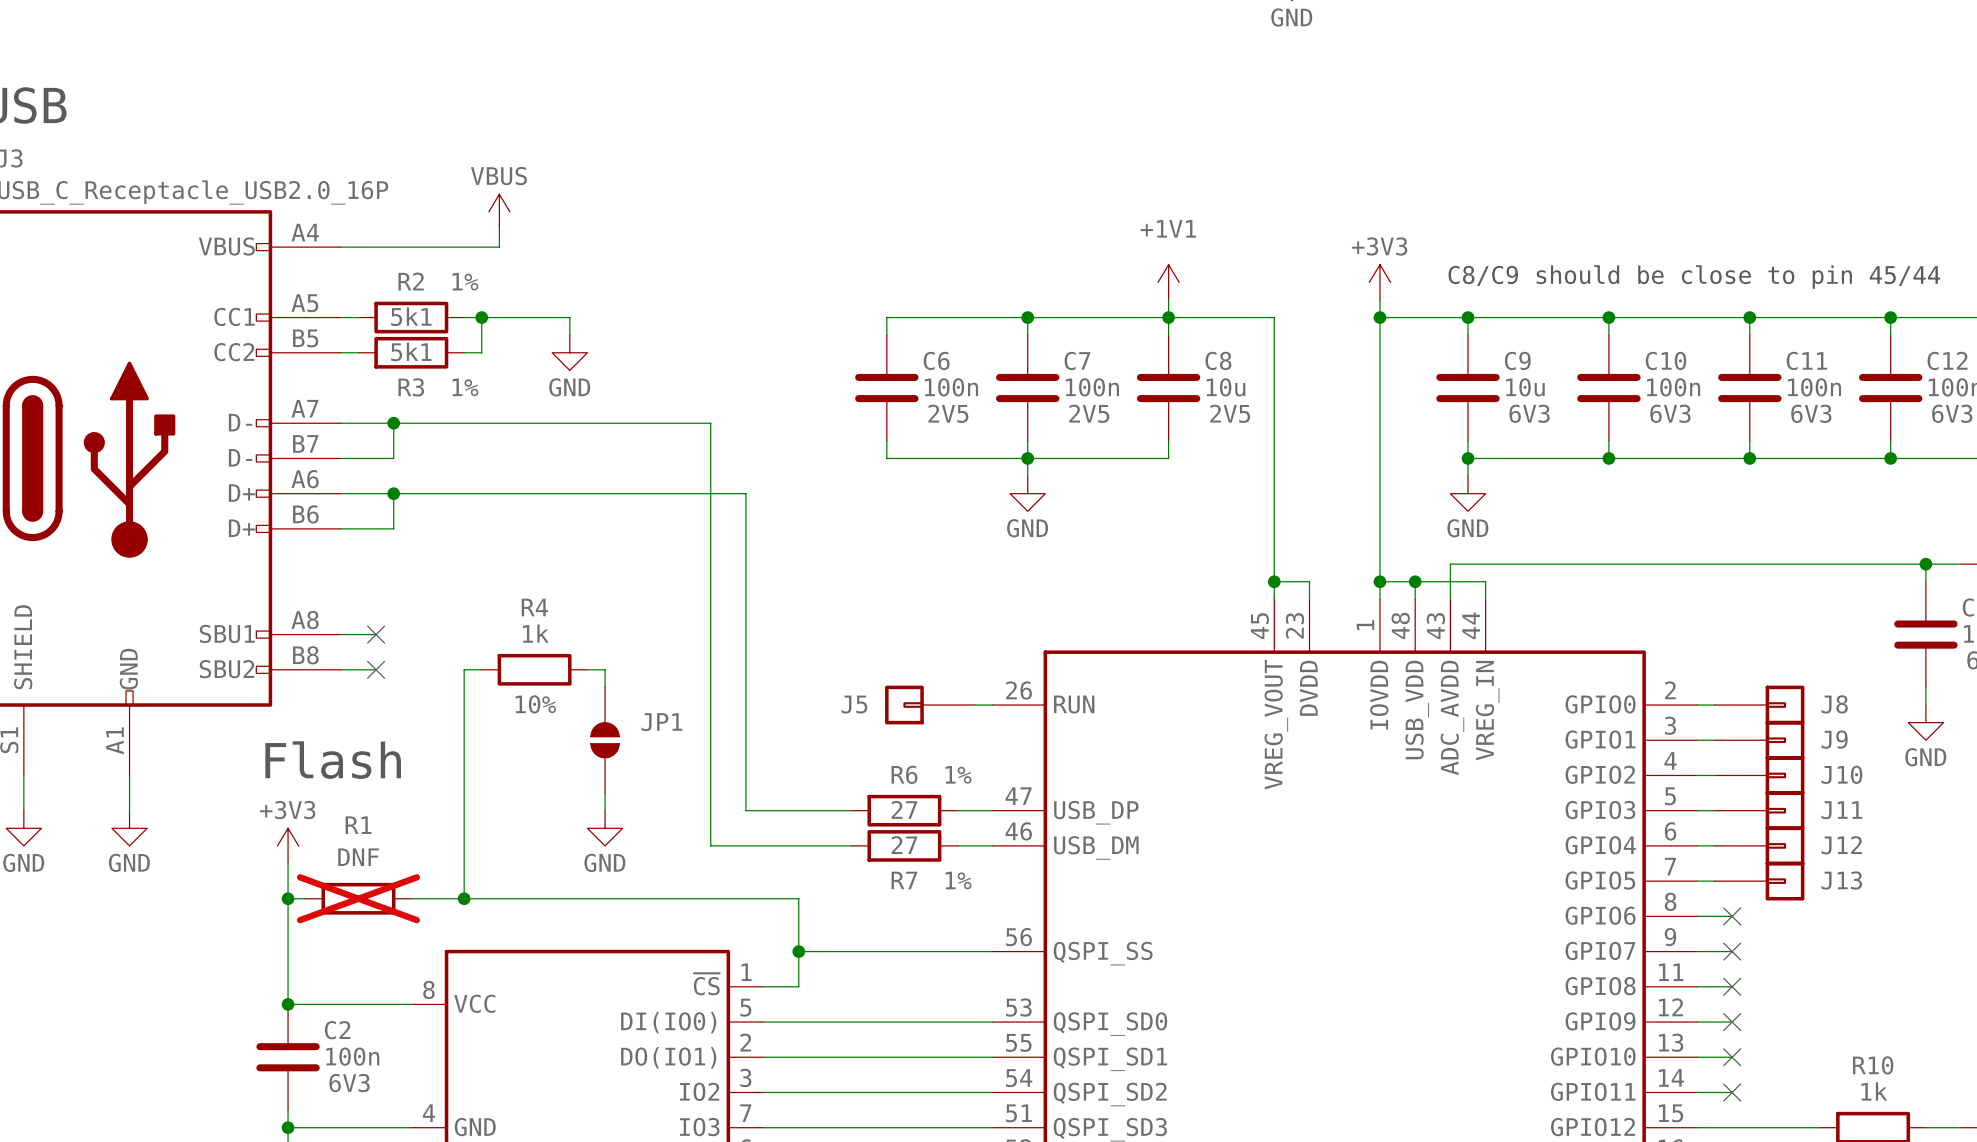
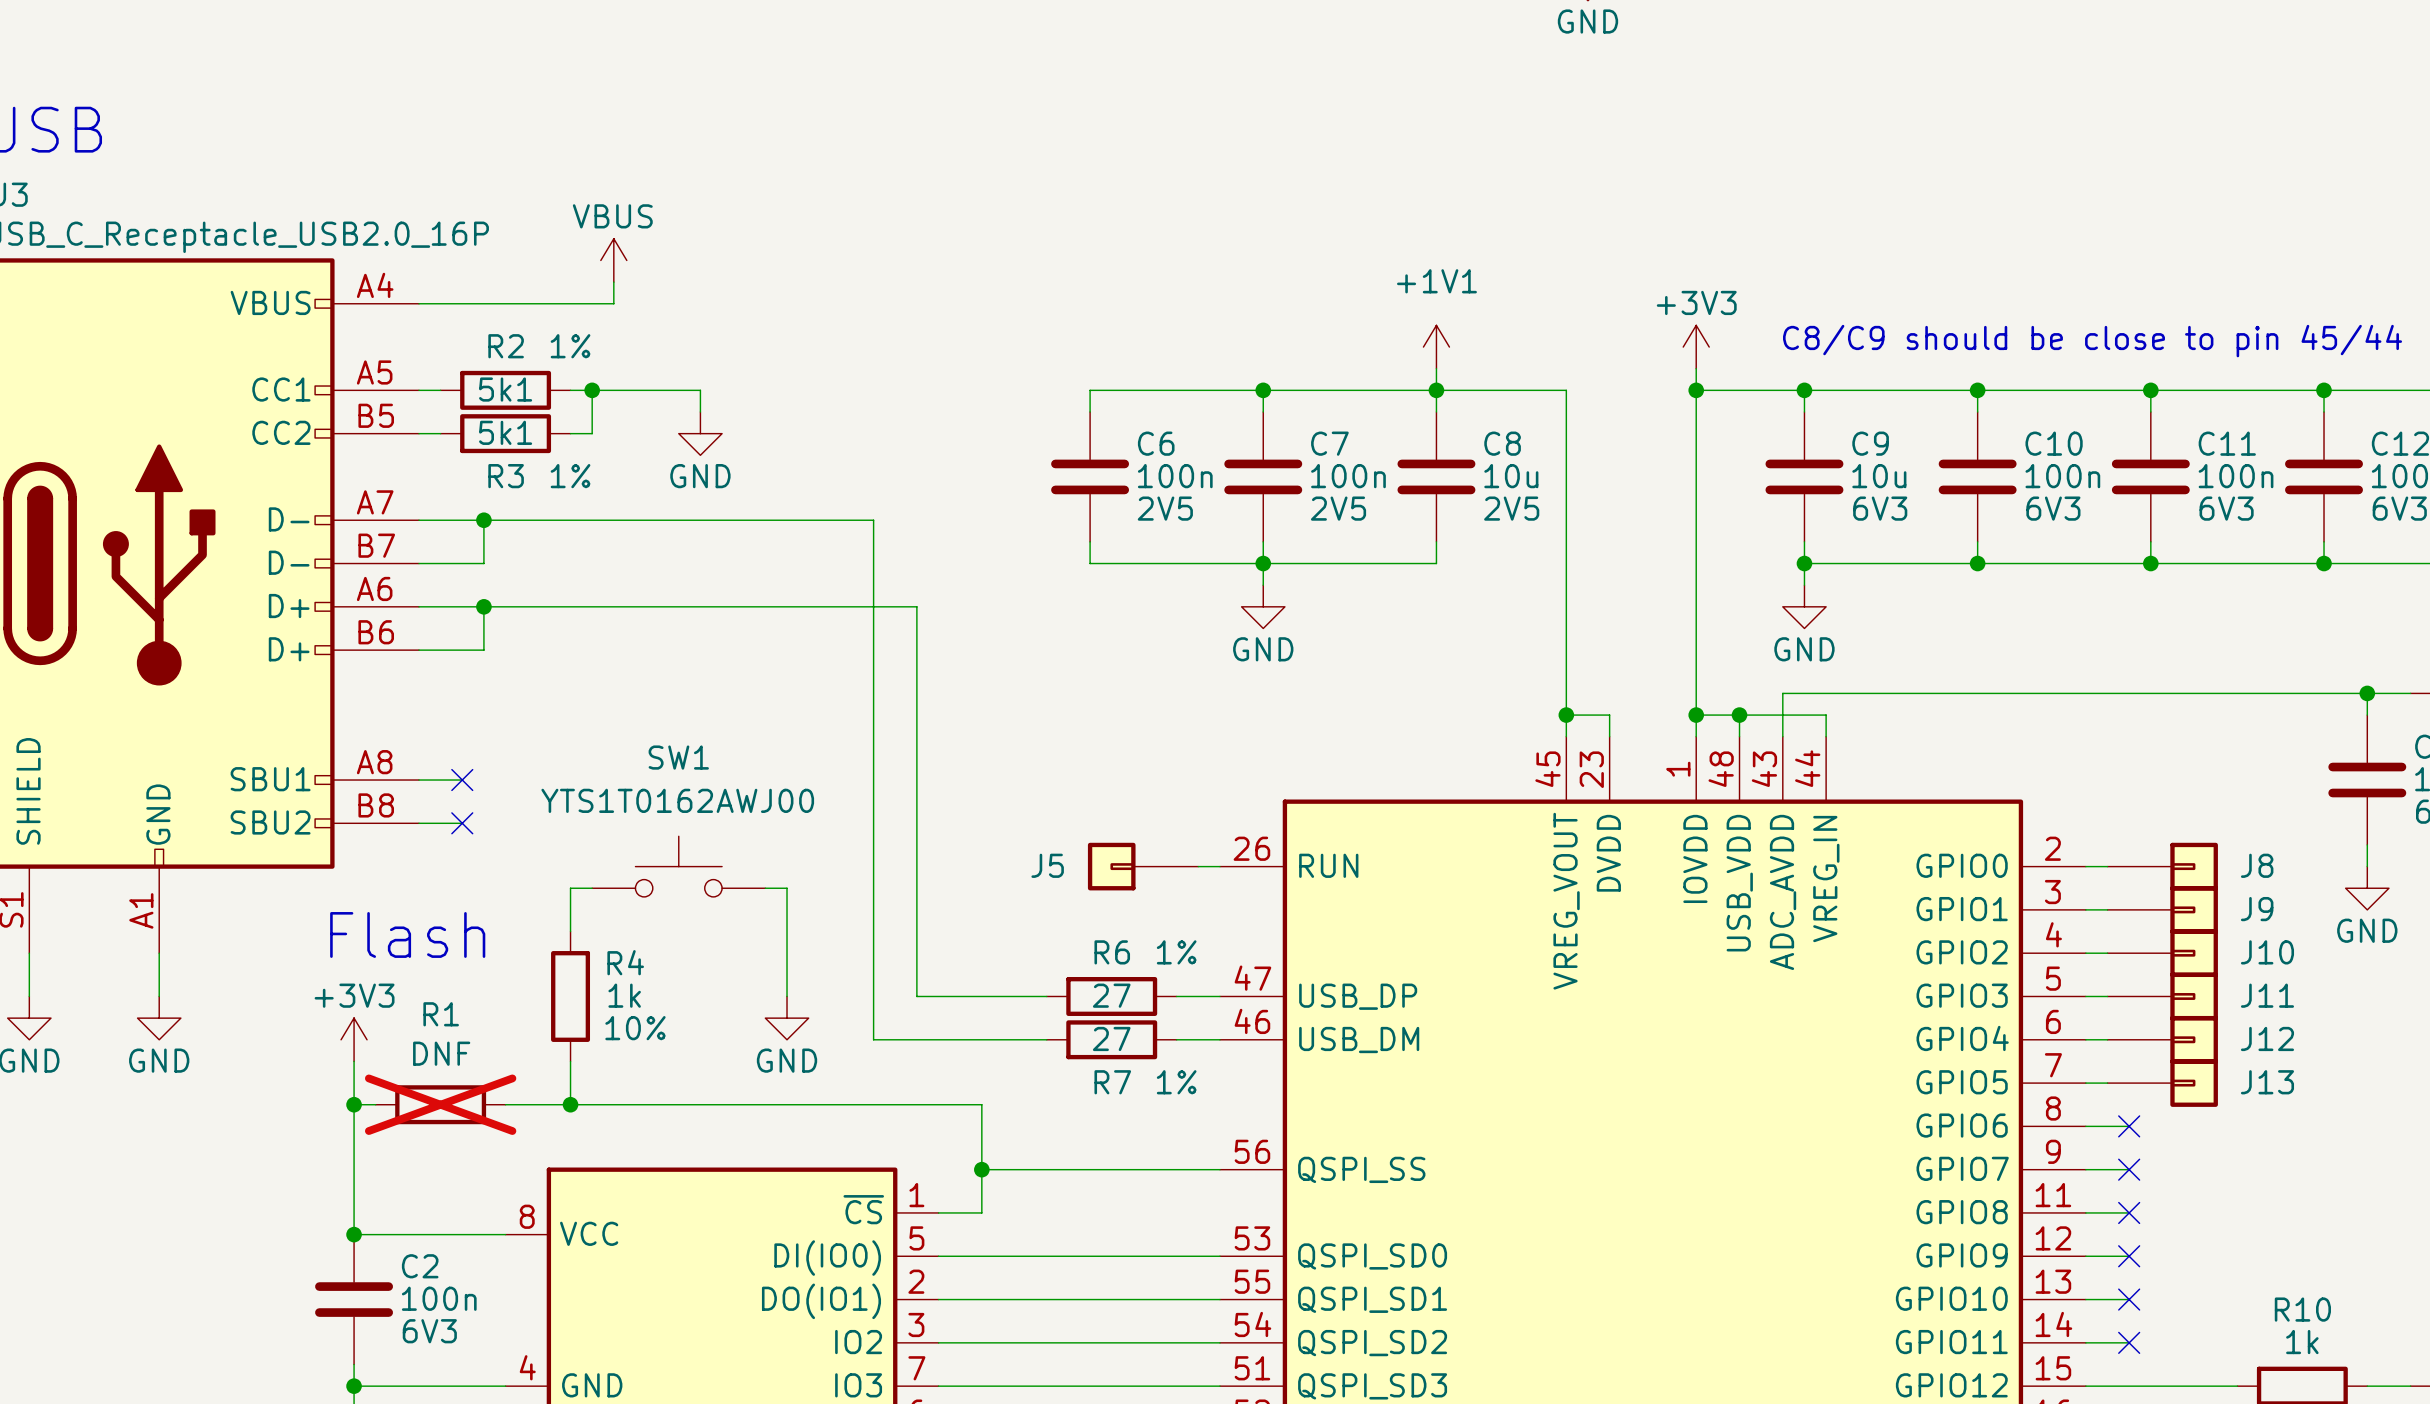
R4 name position: R4 (534, 607) -> R4 (625, 962)
wire: (481, 669) (464, 669) (464, 722) -> (592, 888) (570, 888)
R4 rotation: 0° (534, 669) -> 90° clockwise (570, 996)
R4 position: (534, 669) -> (570, 996)
wire: (587, 669) (605, 669) (605, 687) -> none
R4 text position: 10% (535, 704) -> 10% (635, 1028)
SW1: none -> YTS1T0162AWJ00 (678, 866)
wire: none -> (765, 888) (787, 888) (787, 996)
JP1: (605, 740) -> none
wire: (464, 757) (464, 863) -> none
wire: (605, 793) (605, 810) -> none
power symbol position: GND (605, 828) -> GND (787, 1018)

